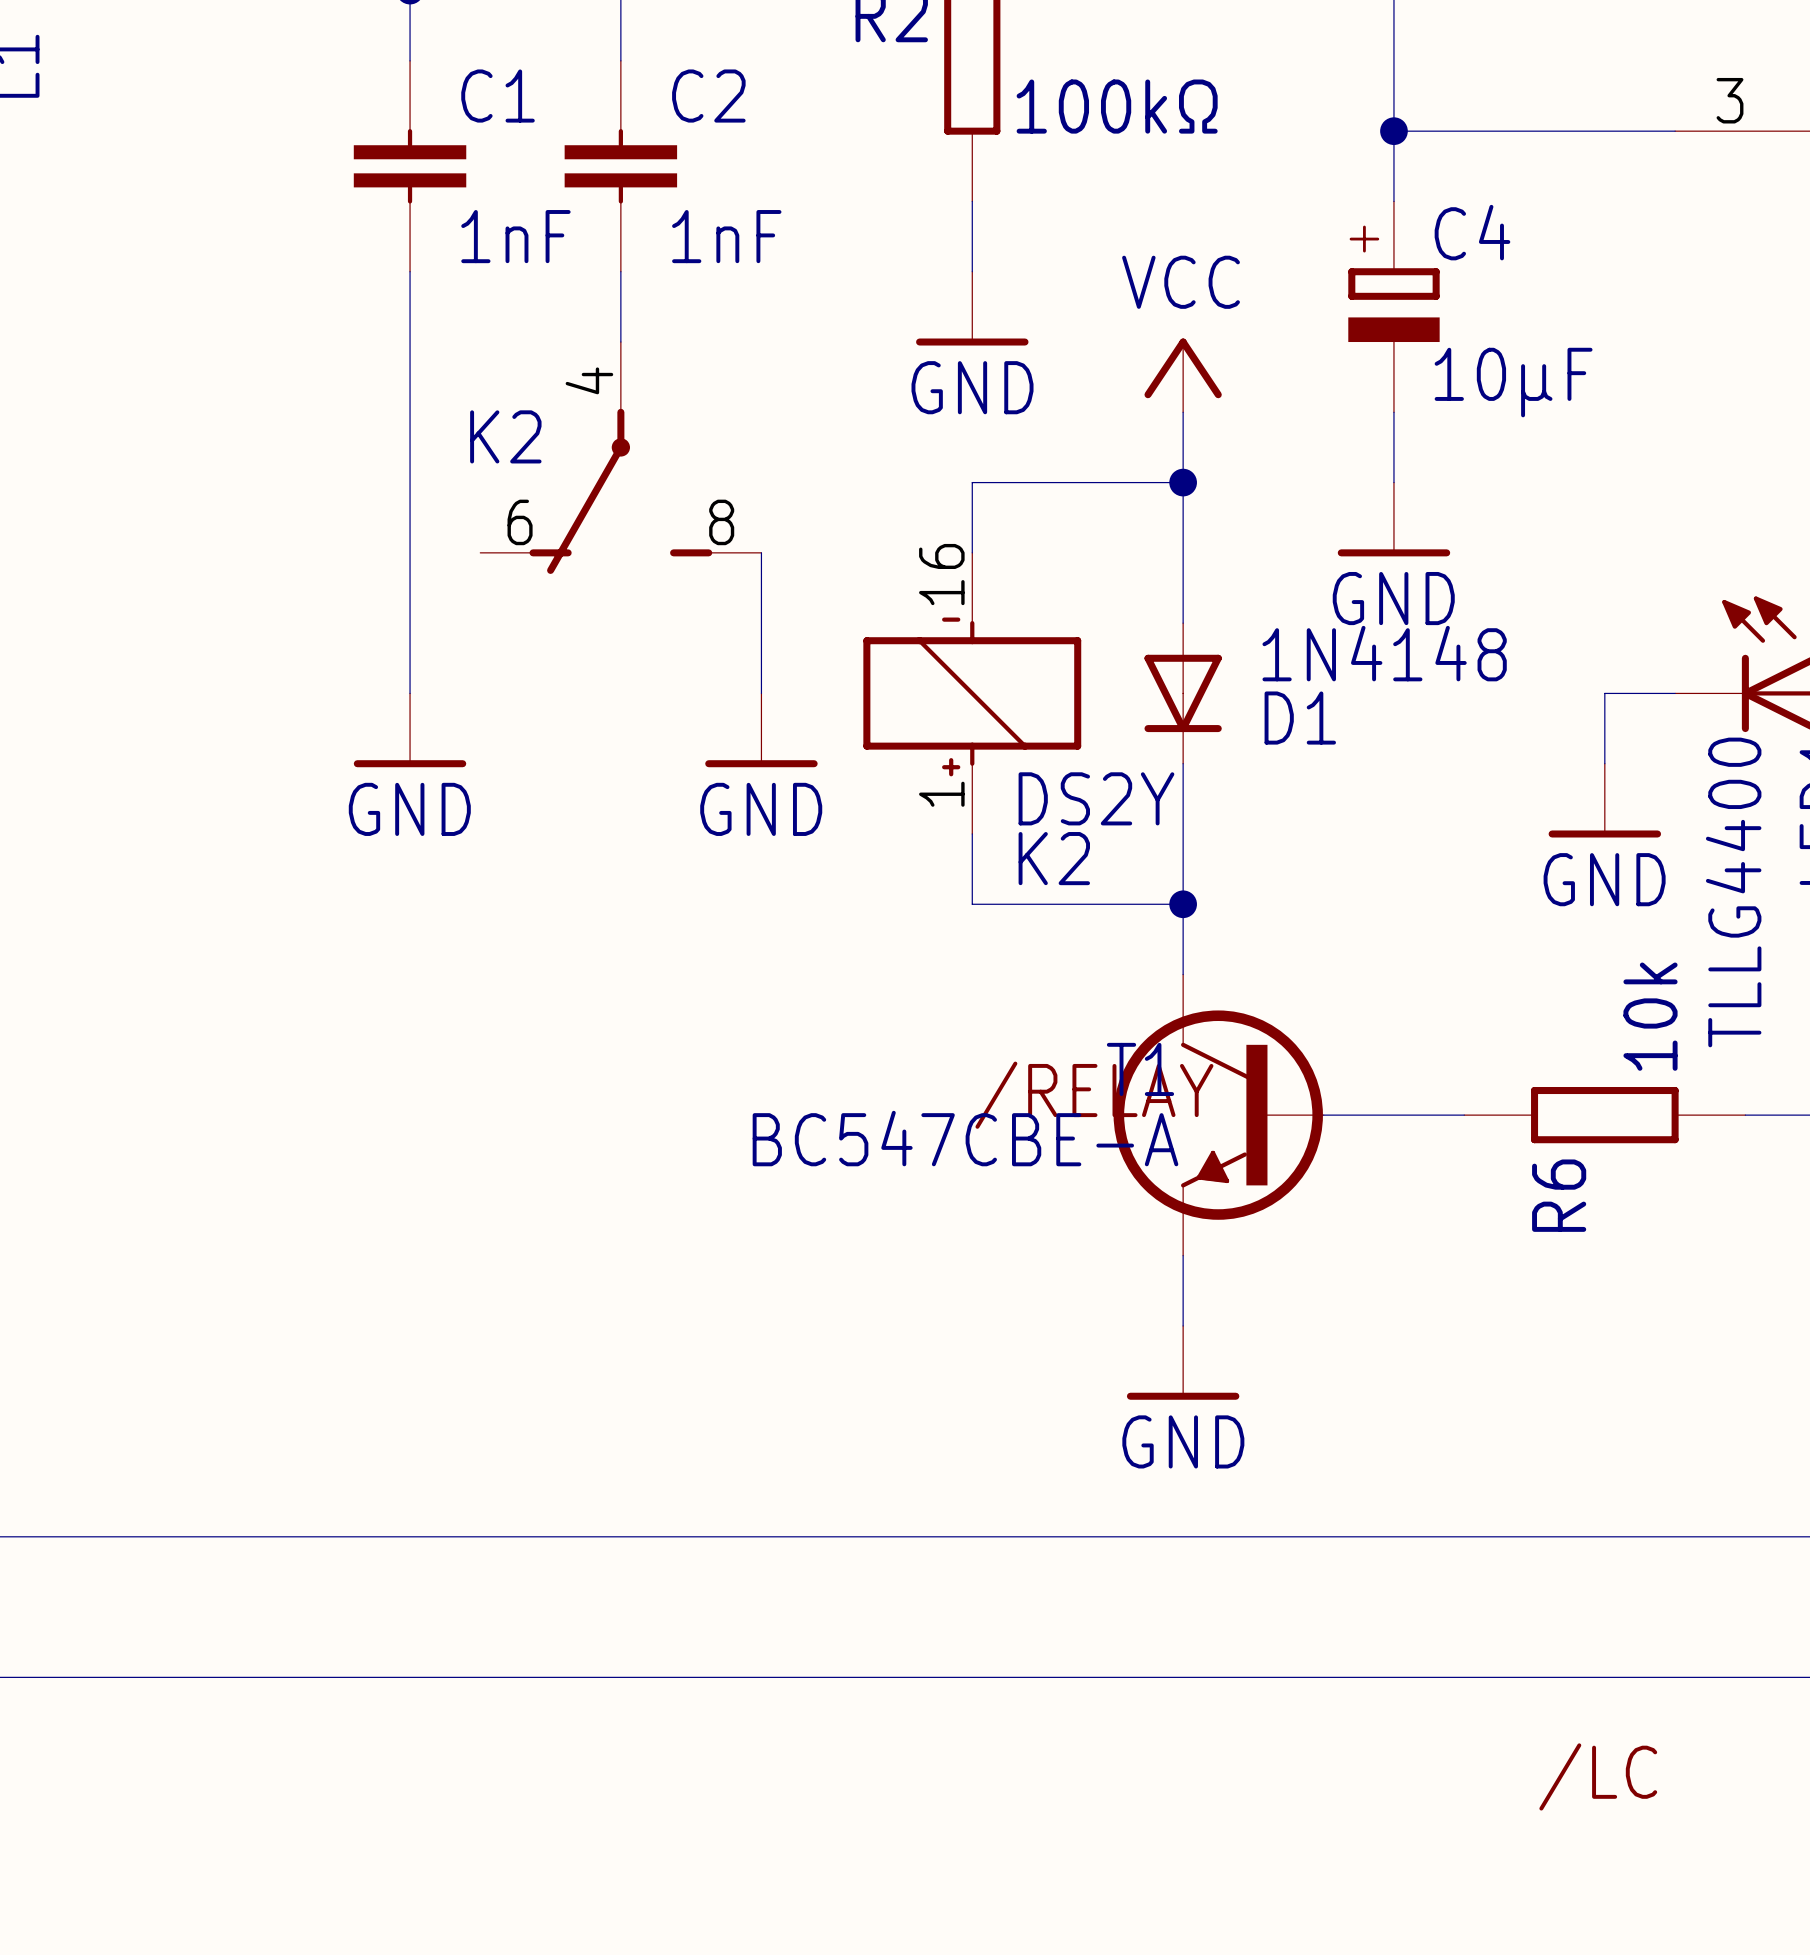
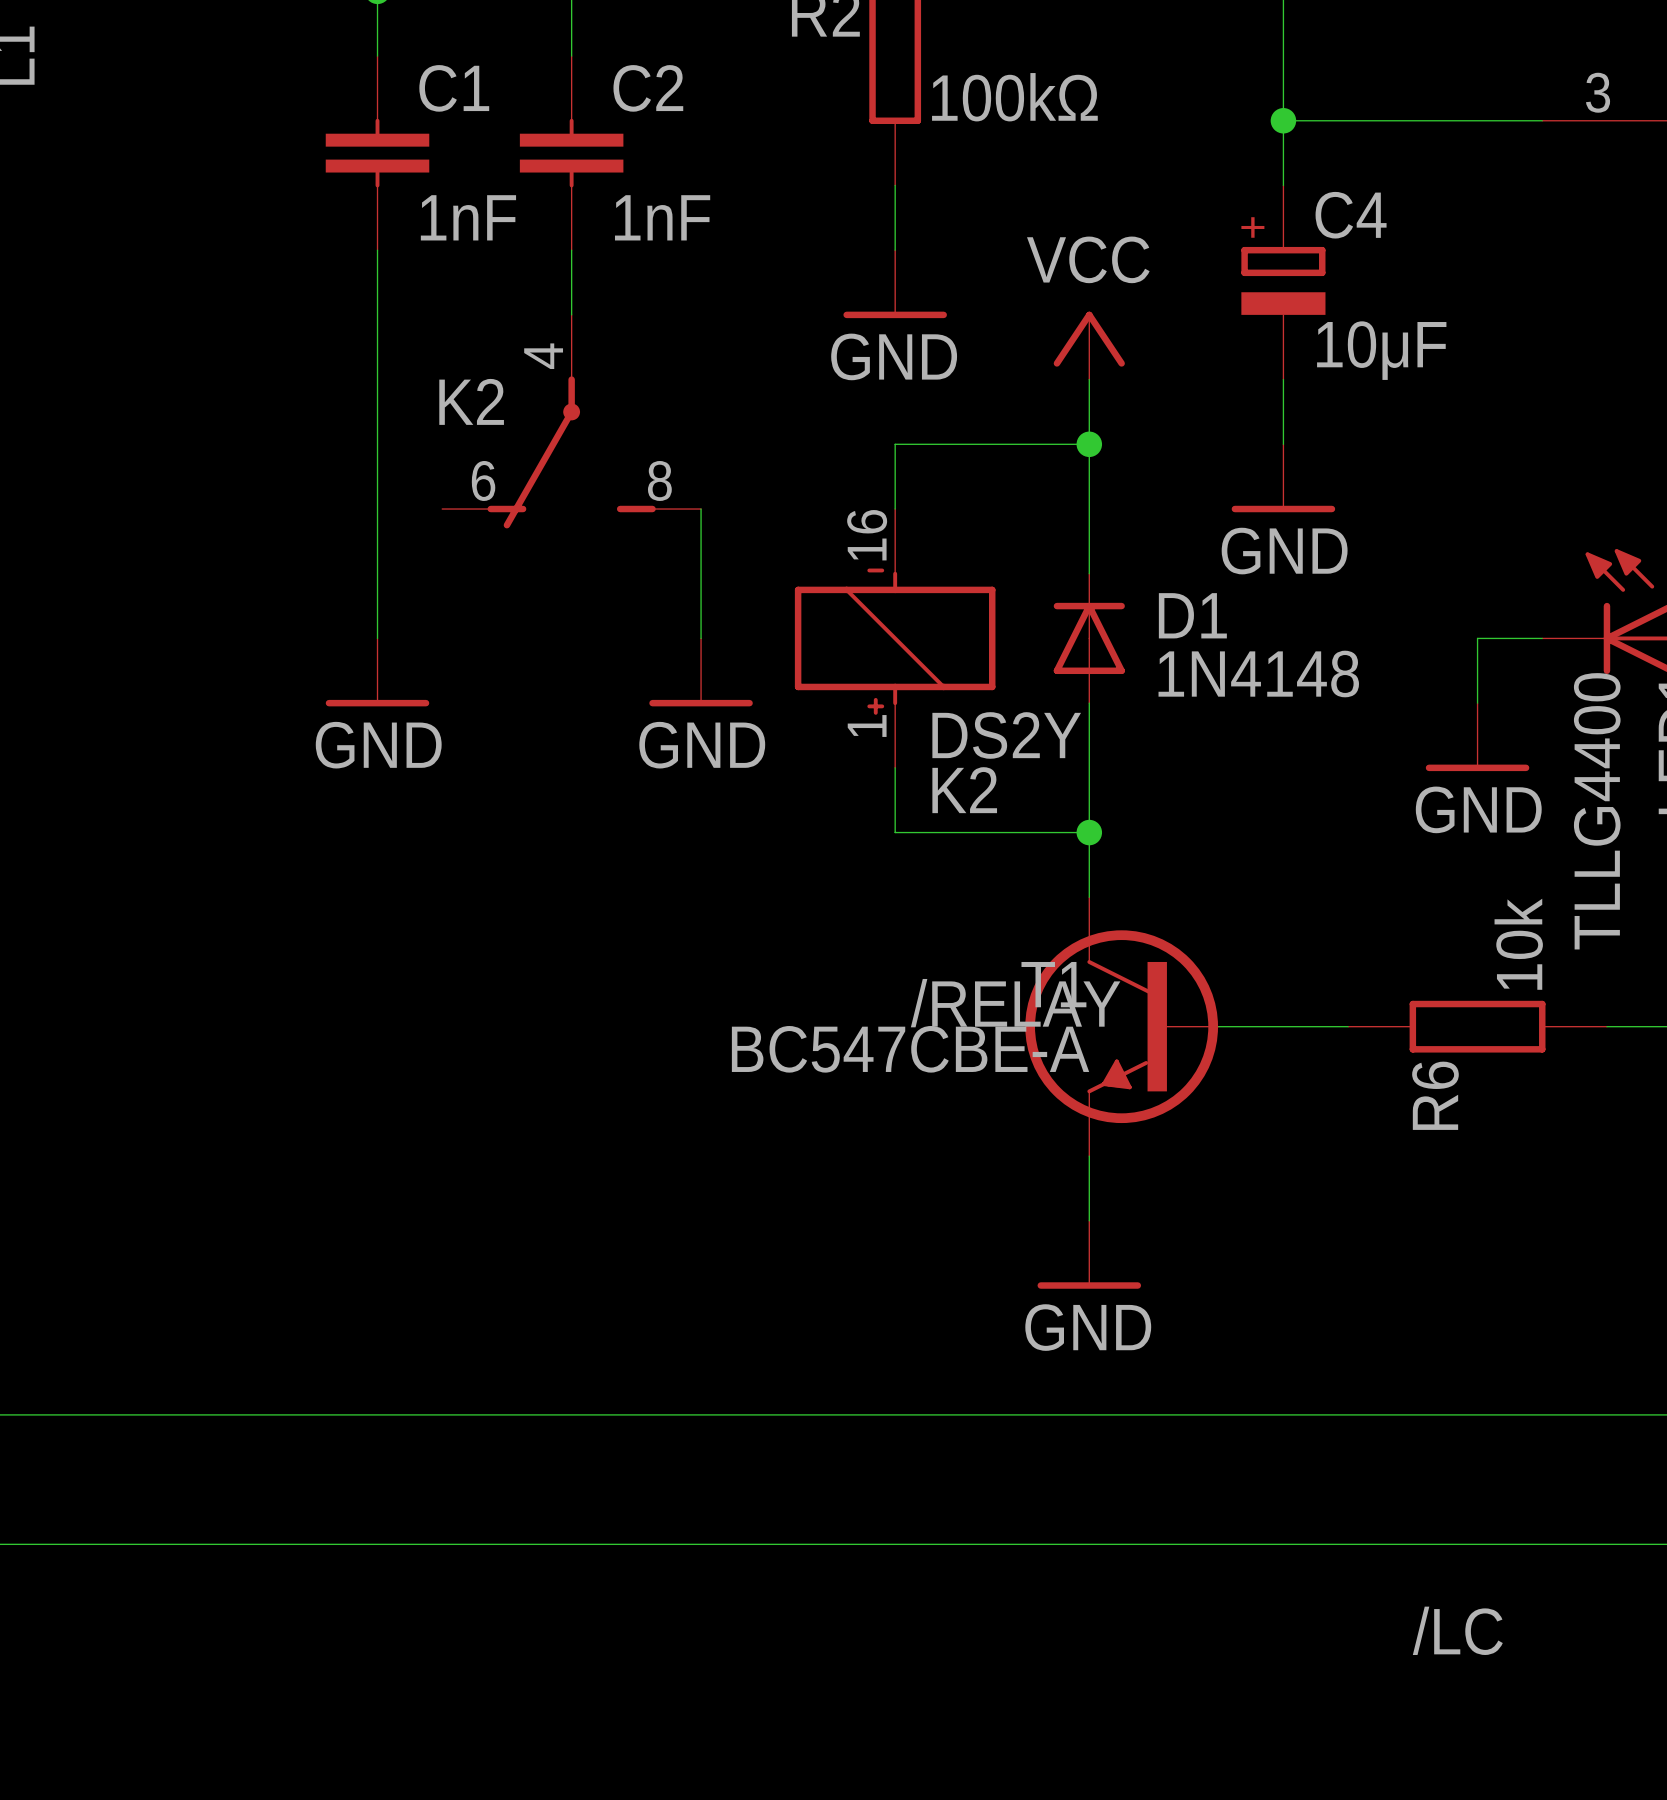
D1 value position: 1N4148 (1384, 653) -> 1N4148 (1258, 674)
D1 rotation: 0° (1183, 693) -> 180° (1089, 638)

